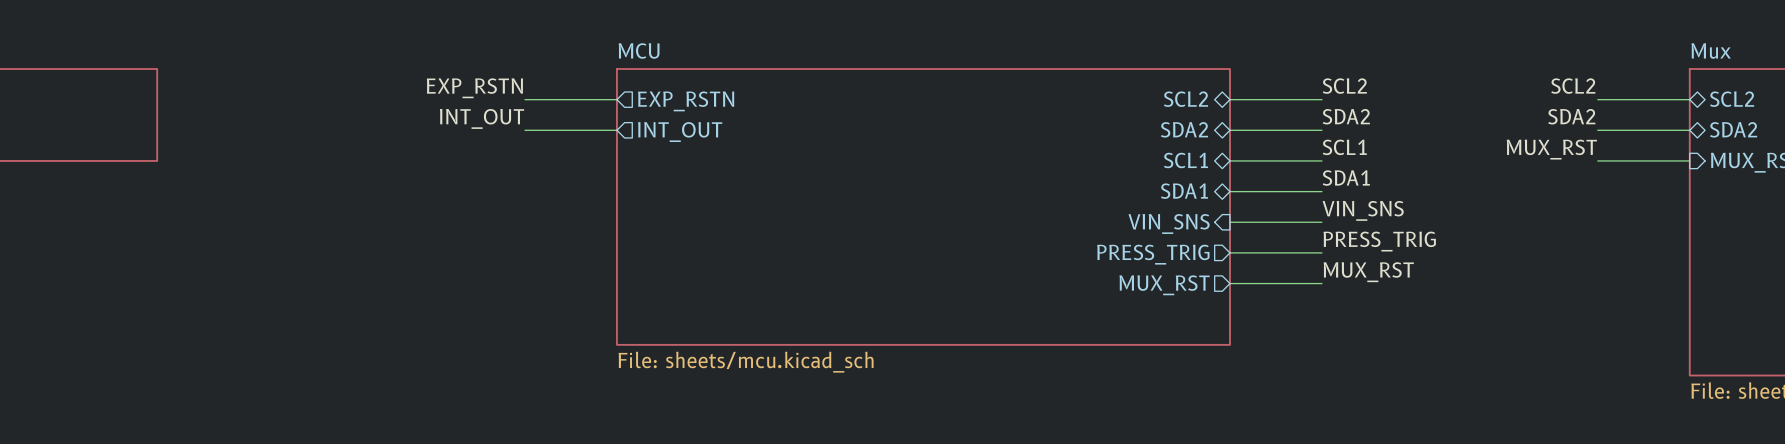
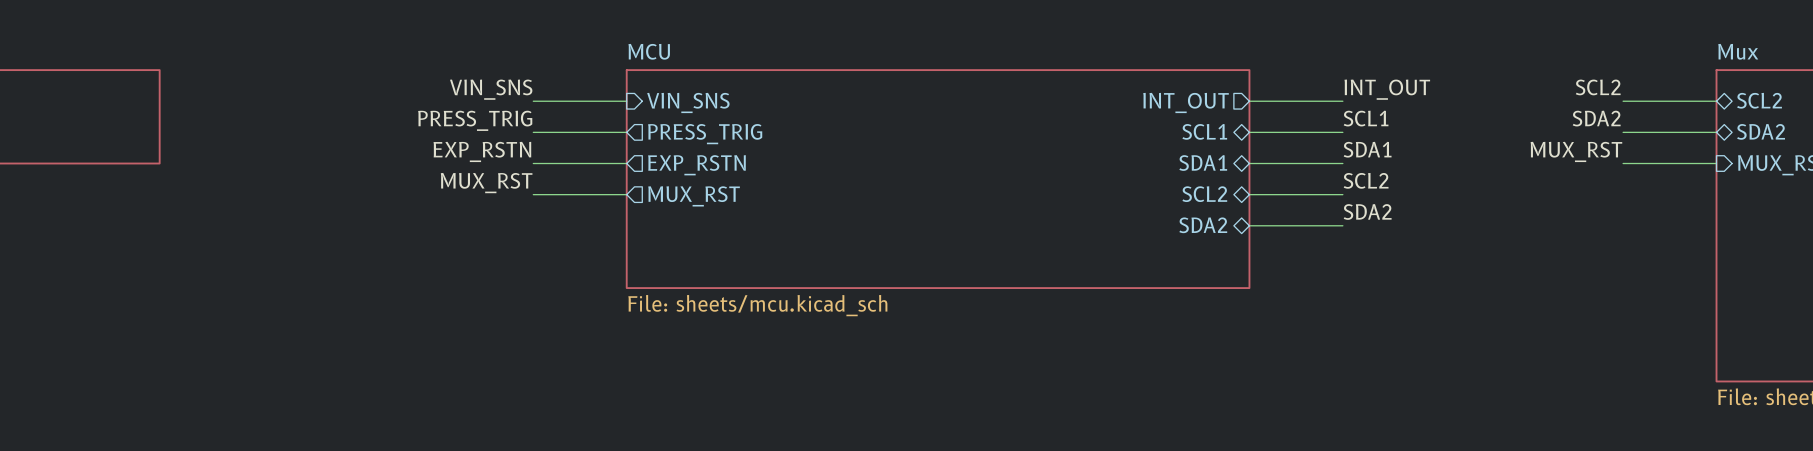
label: SCL2 (1344, 86) -> INT_OUT (1387, 89)
label: EXP_RSTN (474, 88) -> VIN_SNS (491, 89)
sheet pin shape: bidirectional (1186, 99) -> output (1186, 102)
sheet pin: SCL2 (1186, 99) -> INT_OUT (1186, 102)
sheet pin shape: output (686, 101) -> input (688, 102)
sheet pin: EXP_RSTN (686, 101) -> VIN_SNS (688, 102)
label: SDA2 (1346, 116) -> SCL1 (1366, 118)
label: INT_OUT (482, 118) -> PRESS_TRIG (475, 120)
sheet pin: SDA2 (1184, 129) -> SCL1 (1204, 131)
sheet pin: INT_OUT (680, 132) -> PRESS_TRIG (705, 134)
label: SCL1 (1344, 147) -> SDA1 (1367, 149)
label: none -> EXP_RSTN (482, 151)
wire: none -> (533, 163) (626, 163)
sheet pin: SCL1 (1185, 160) -> SDA1 (1203, 163)
sheet pin: none -> EXP_RSTN (696, 165)
sheet MCU: none -> File: sheets/mcu.kicad_sch (938, 179)
label: SDA1 (1346, 178) -> SCL2 (1366, 180)
label: none -> MUX_RST (486, 183)
wire: none -> (533, 194) (626, 194)
sheet pin: SDA1 (1184, 191) -> SCL2 (1204, 194)
sheet pin: none -> MUX_RST (694, 196)
sheet MCU: File: sheets/mcu.kicad_sch (923, 206) -> none
label: VIN_SNS (1363, 210) -> SDA2 (1367, 211)
sheet pin shape: input (1169, 223) -> bidirectional (1203, 225)
sheet pin: VIN_SNS (1169, 223) -> SDA2 (1203, 225)
label: PRESS_TRIG (1379, 241) -> none
wire: (1229, 252) (1321, 252) -> none
sheet pin: PRESS_TRIG (1153, 254) -> none
label: MUX_RST (1368, 272) -> none
wire: (1229, 283) (1321, 283) -> none
sheet pin: MUX_RST (1164, 285) -> none

